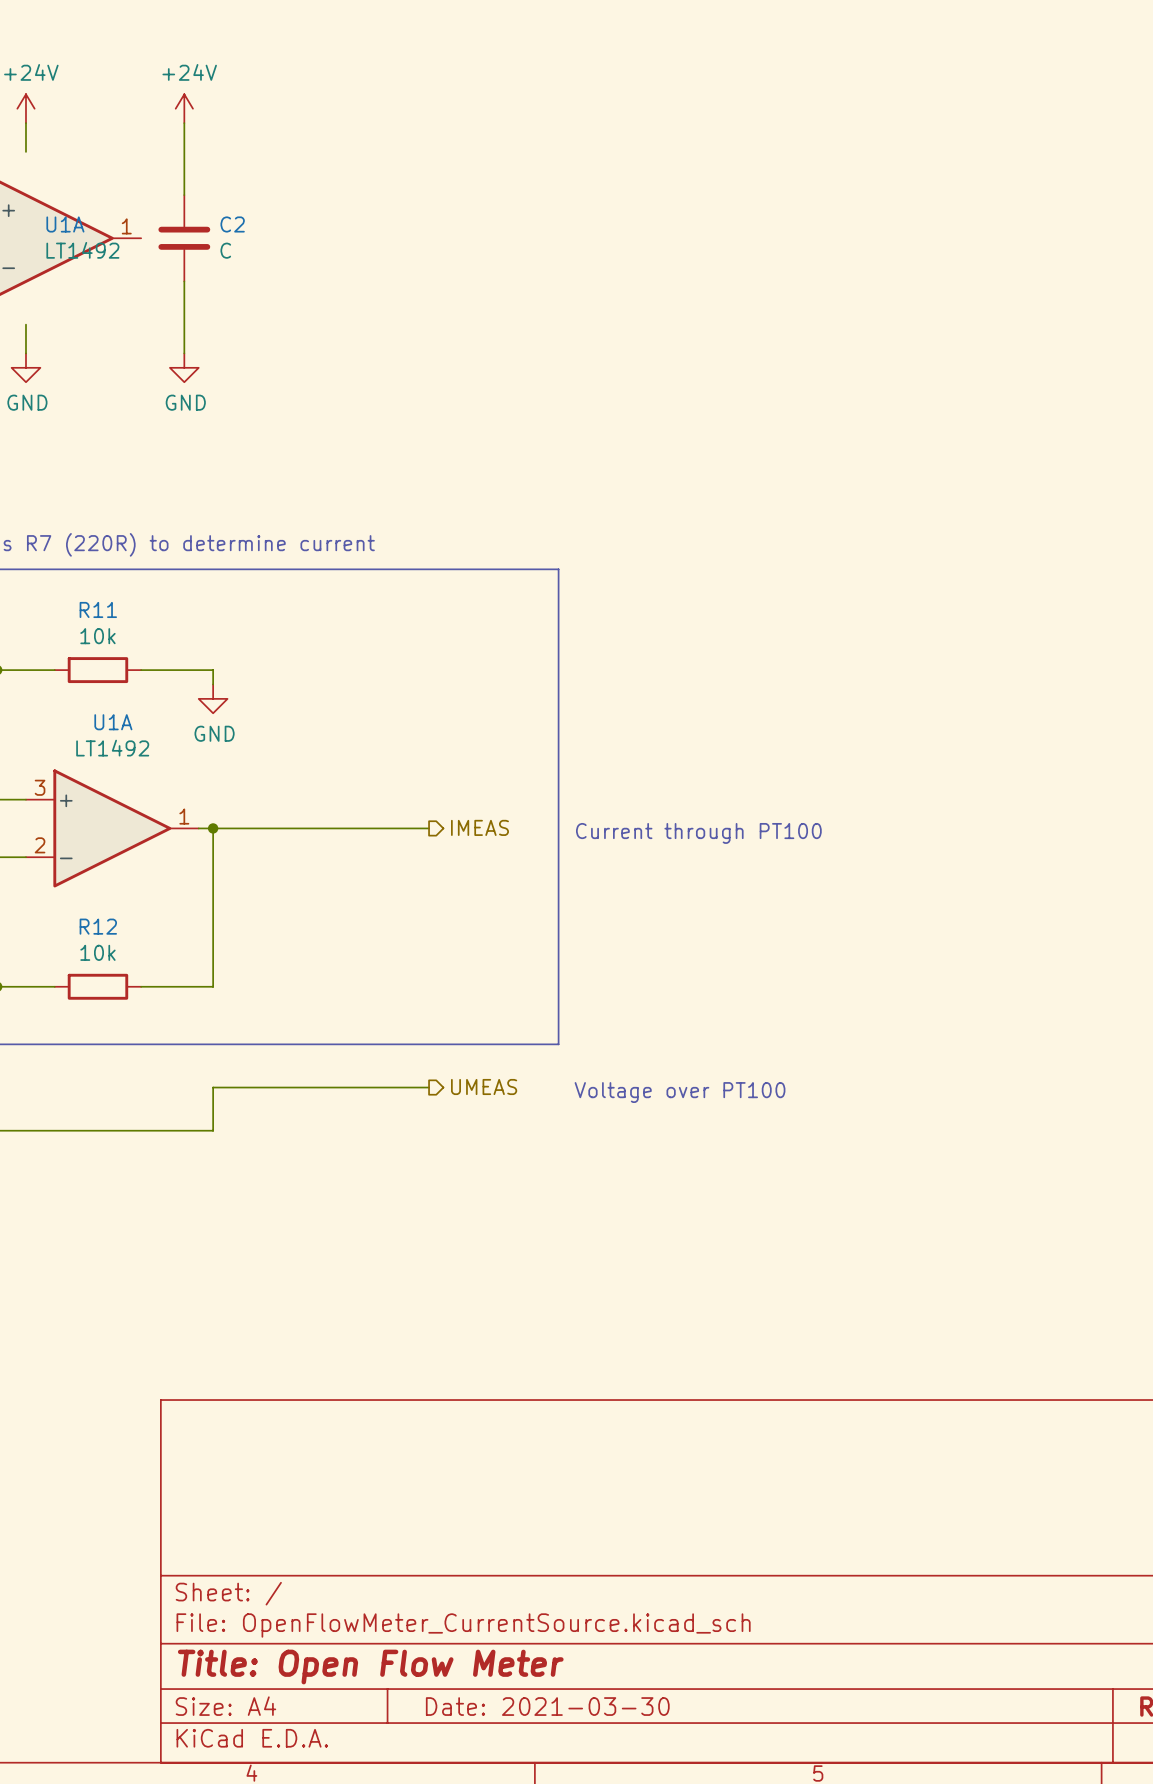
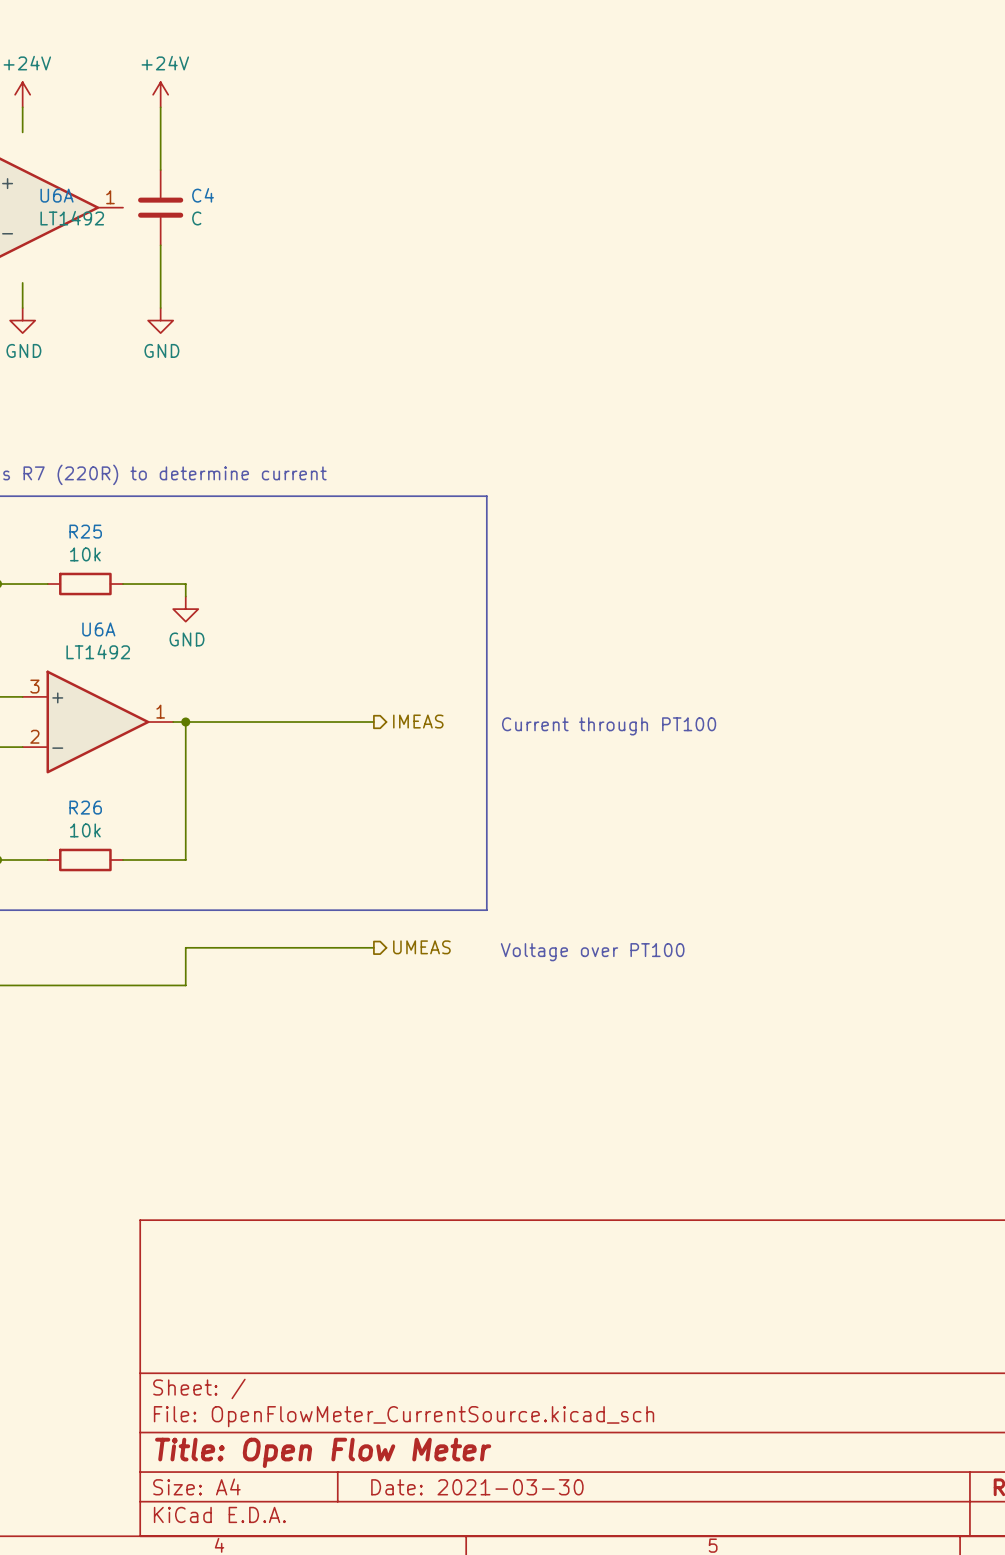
U1A name: U1A (65, 224) -> U6A (57, 195)
C2 name: C2 (232, 224) -> C4 (203, 195)
R11 name: R11 (98, 609) -> R25 (85, 531)
U1A name: U1A (113, 722) -> U6A (98, 629)
R12 name: R12 (98, 926) -> R26 (85, 807)

